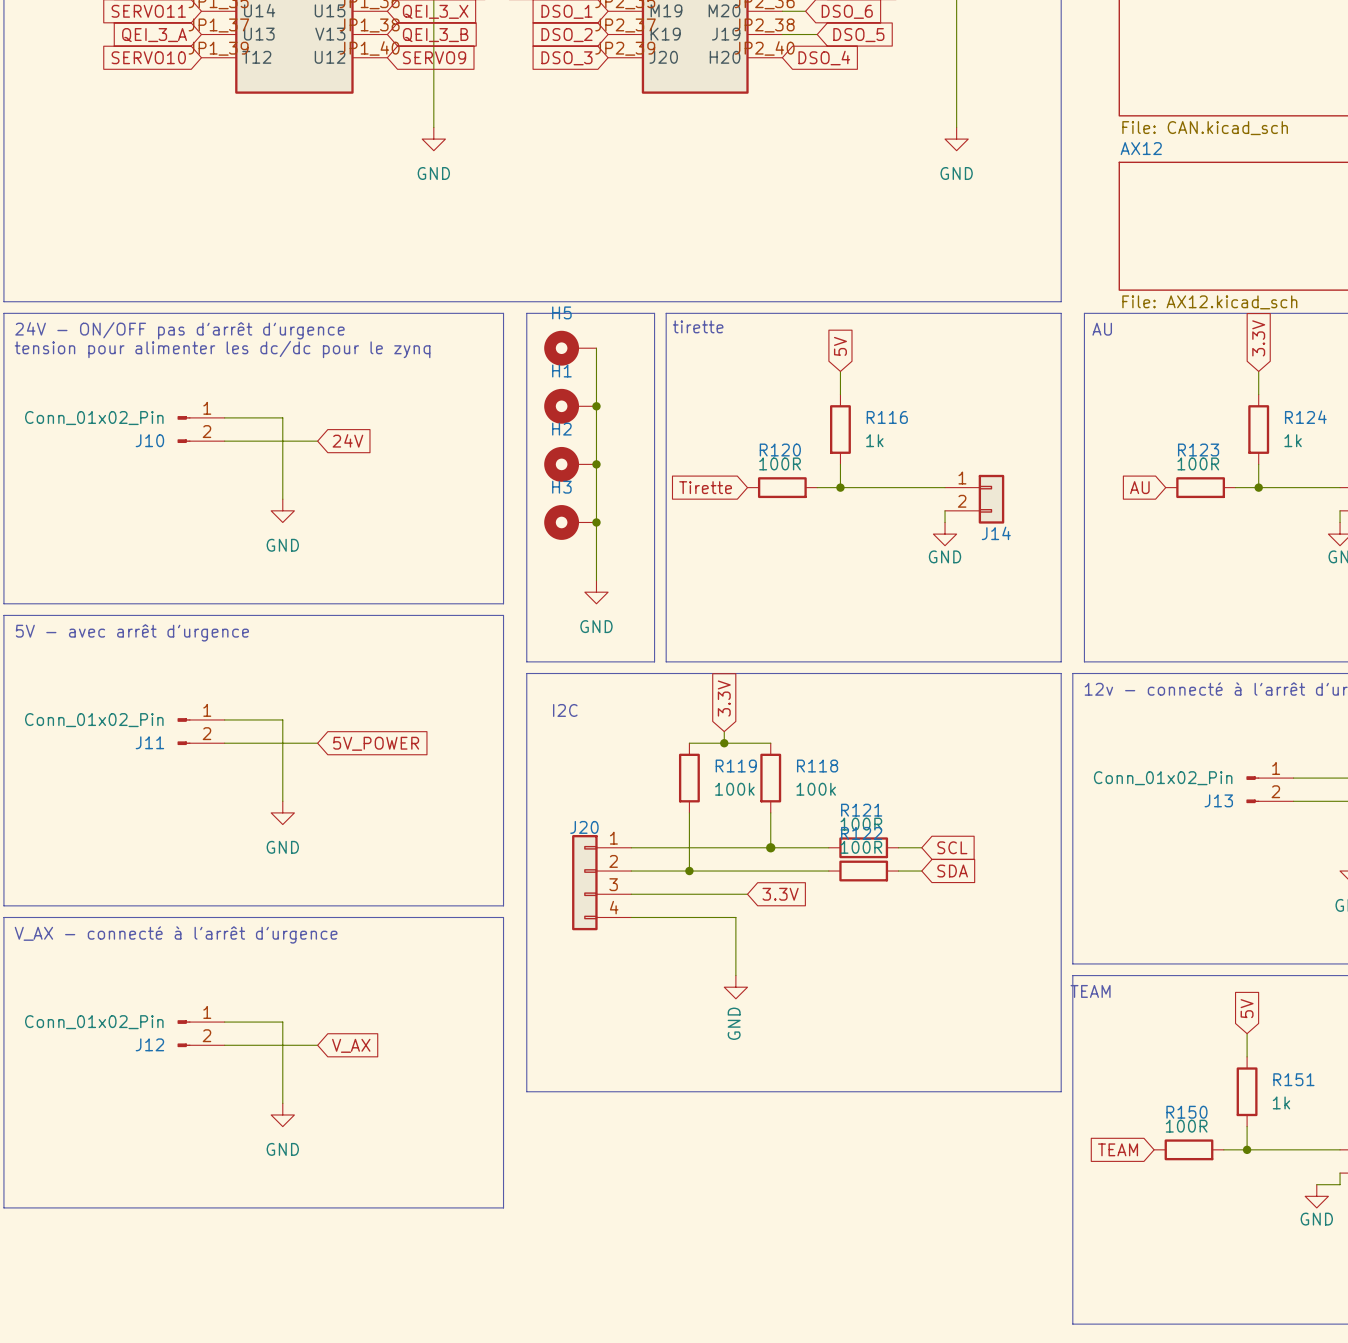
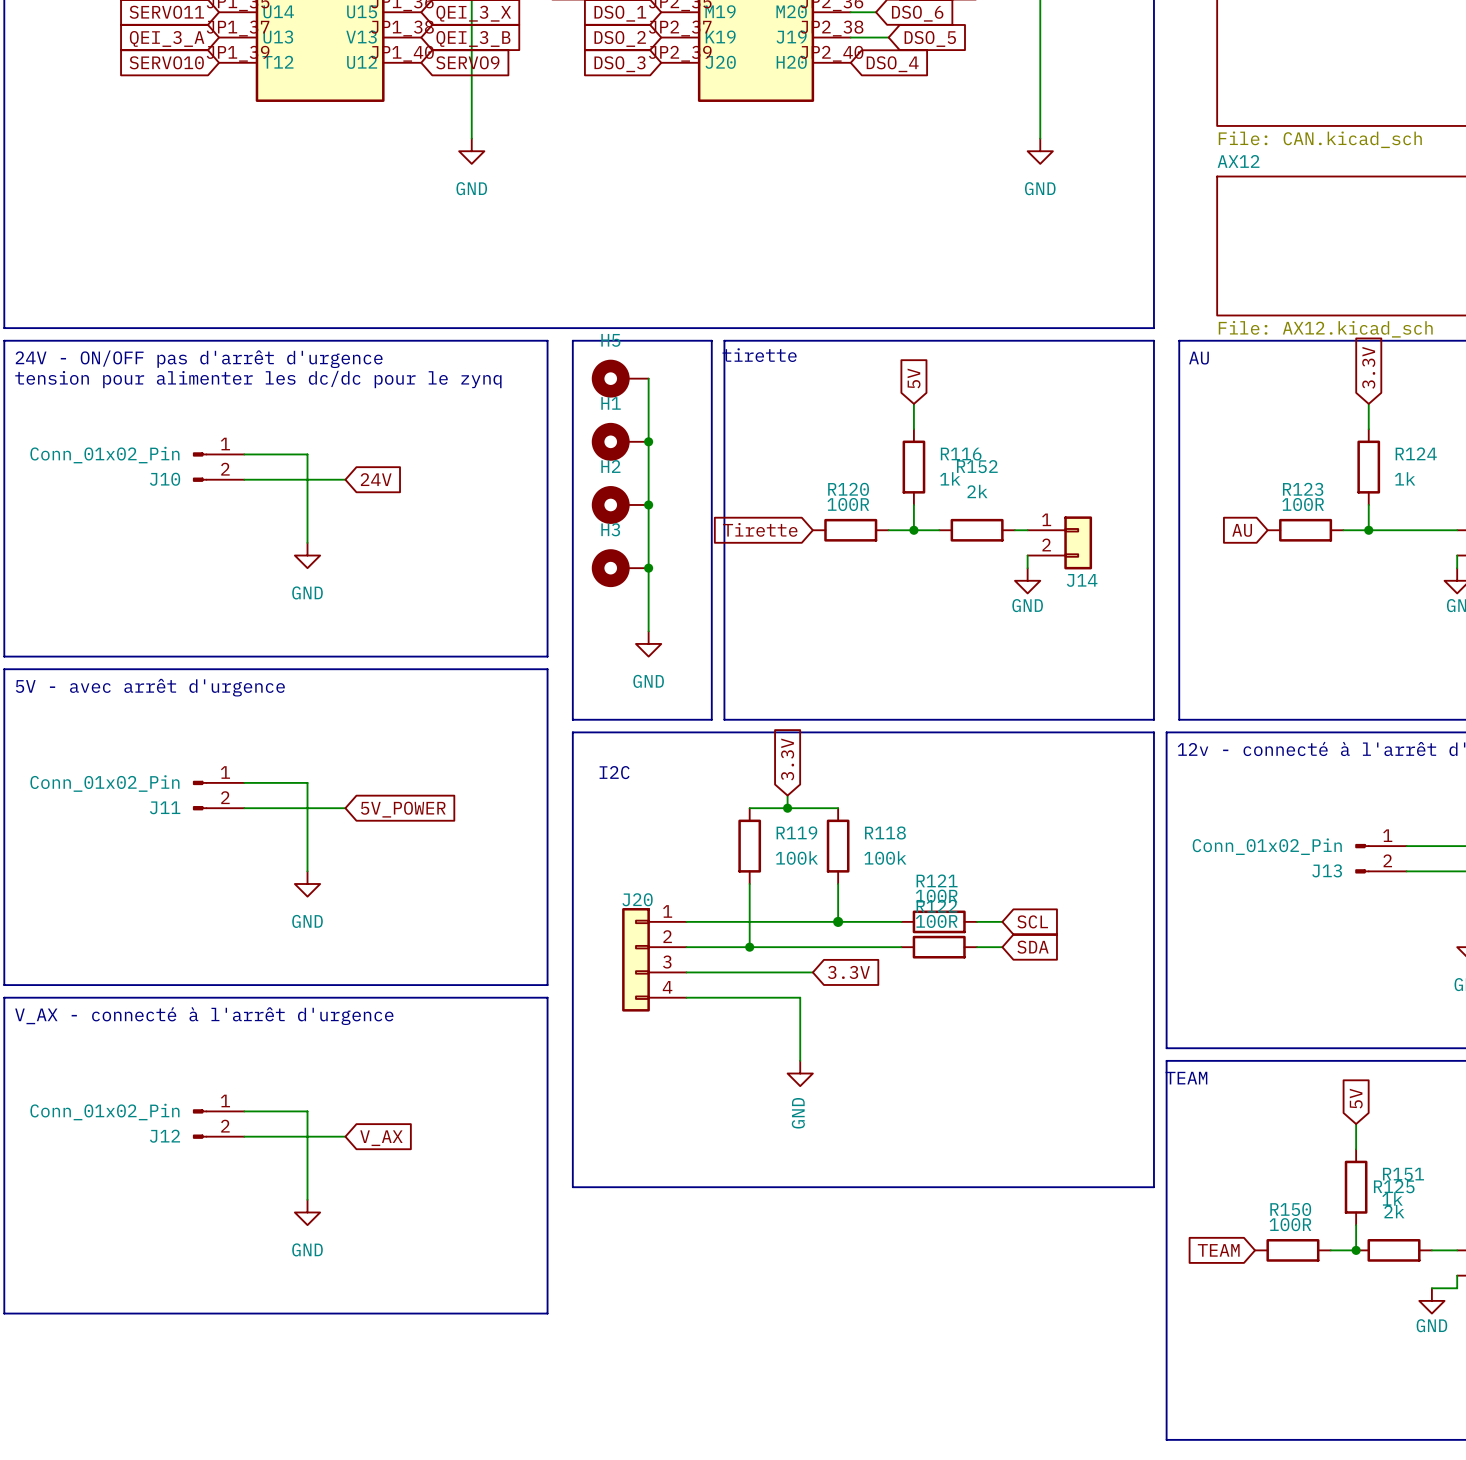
wire: (863, 487) (933, 487) -> none
R152: none -> 2k (977, 530)
wire: (1247, 1149) (1316, 1149) -> none
R125: none -> 2k (1394, 1250)

